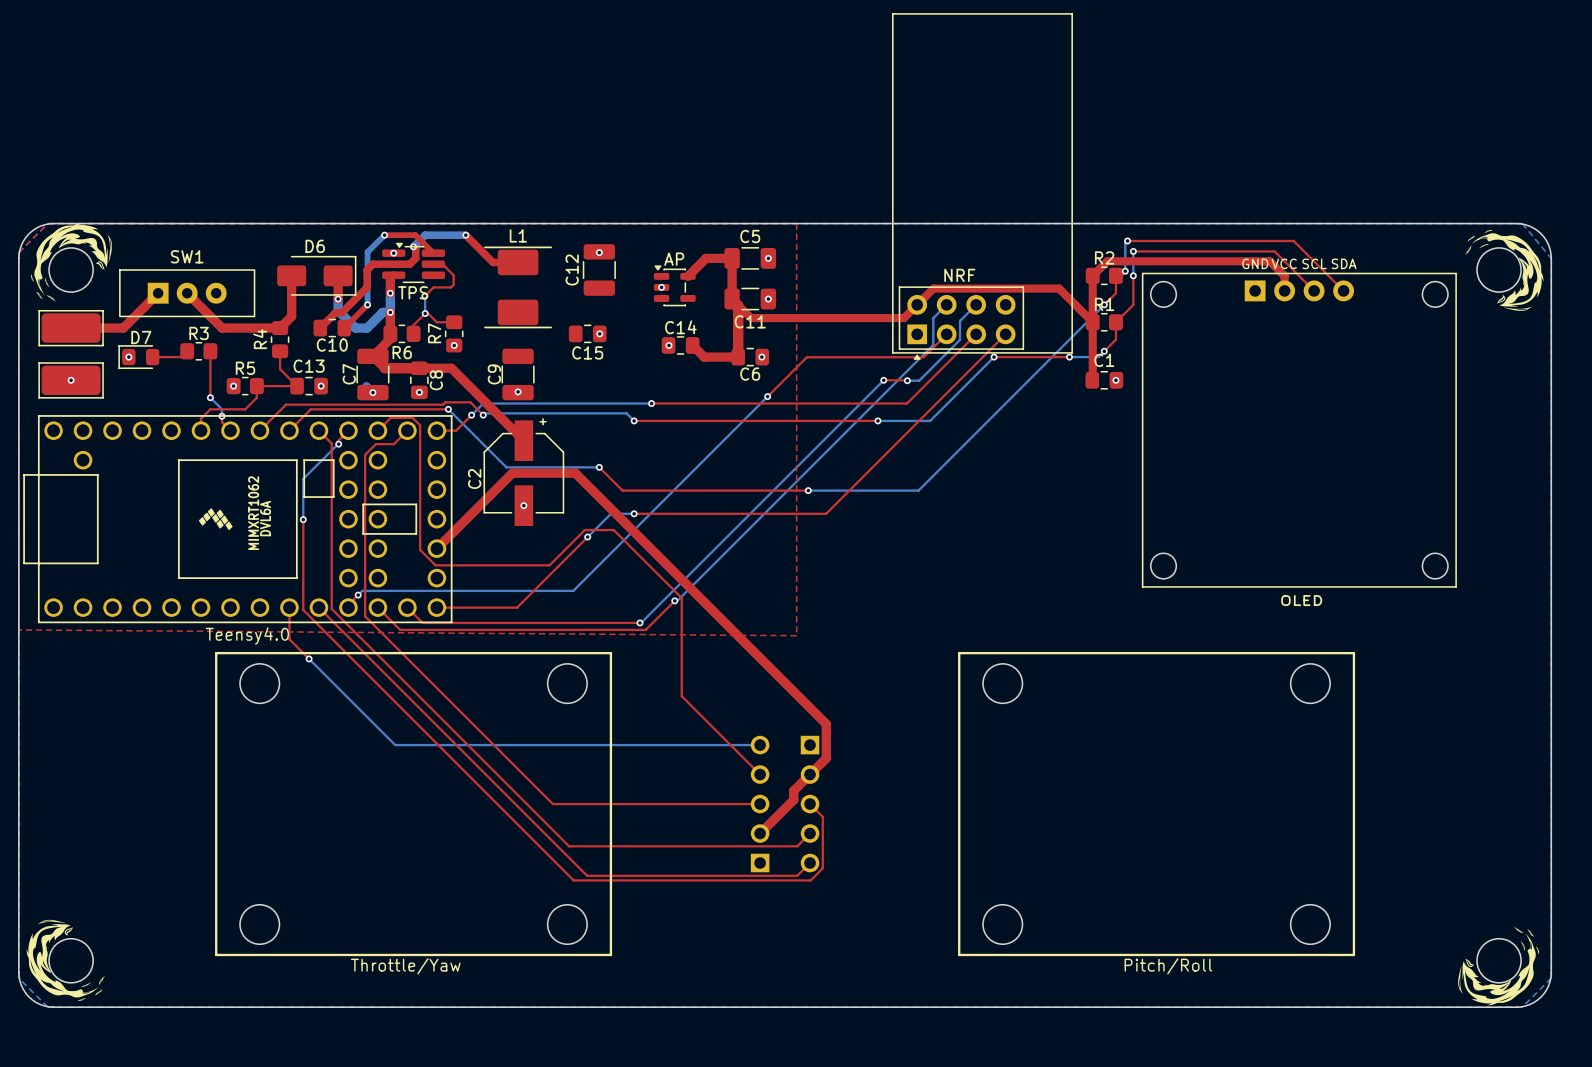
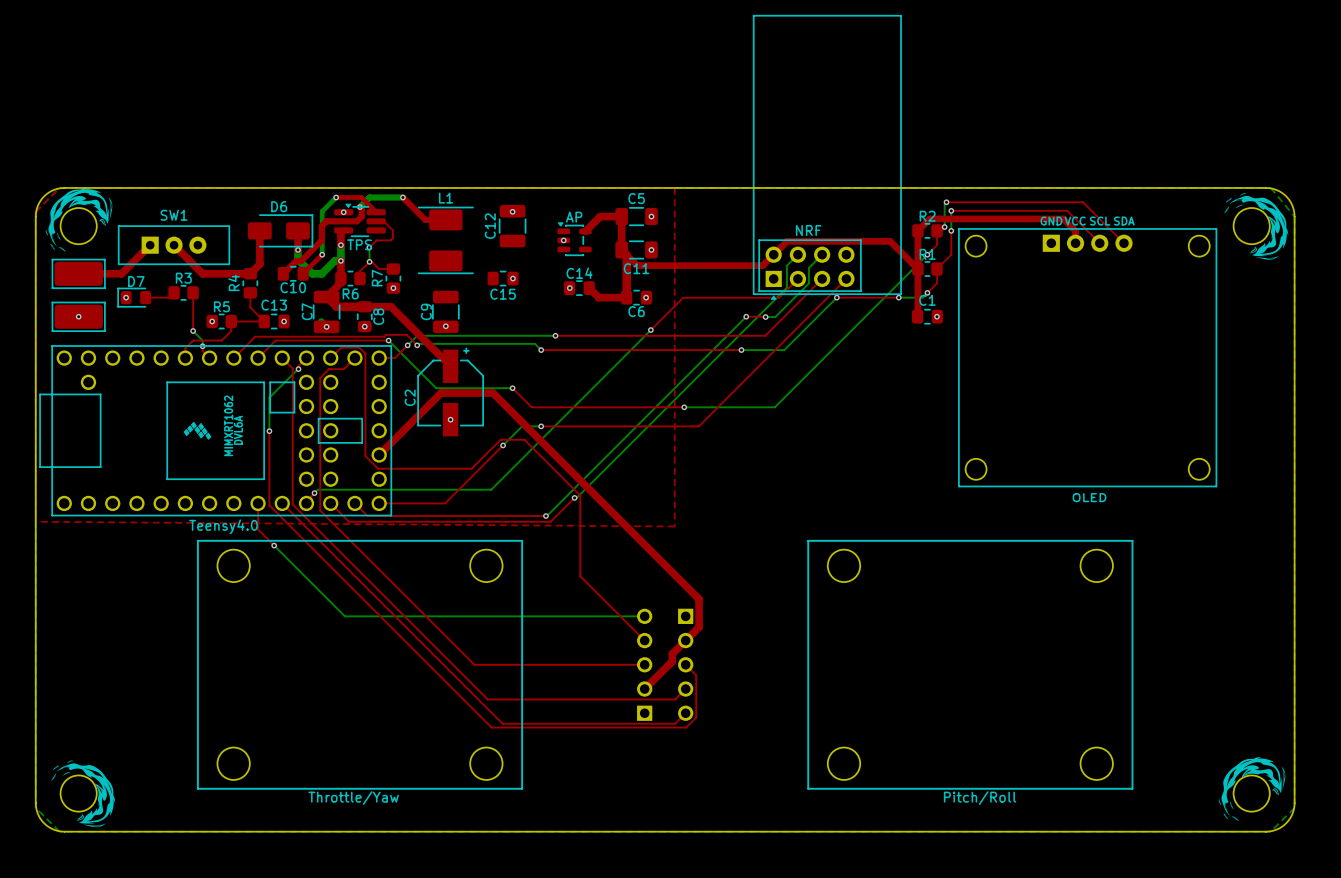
drawing shape: [26, 919, 106, 1001] -> [50, 760, 116, 828]
drawing shape: [1458, 926, 1540, 1006] -> [1218, 757, 1286, 822]

